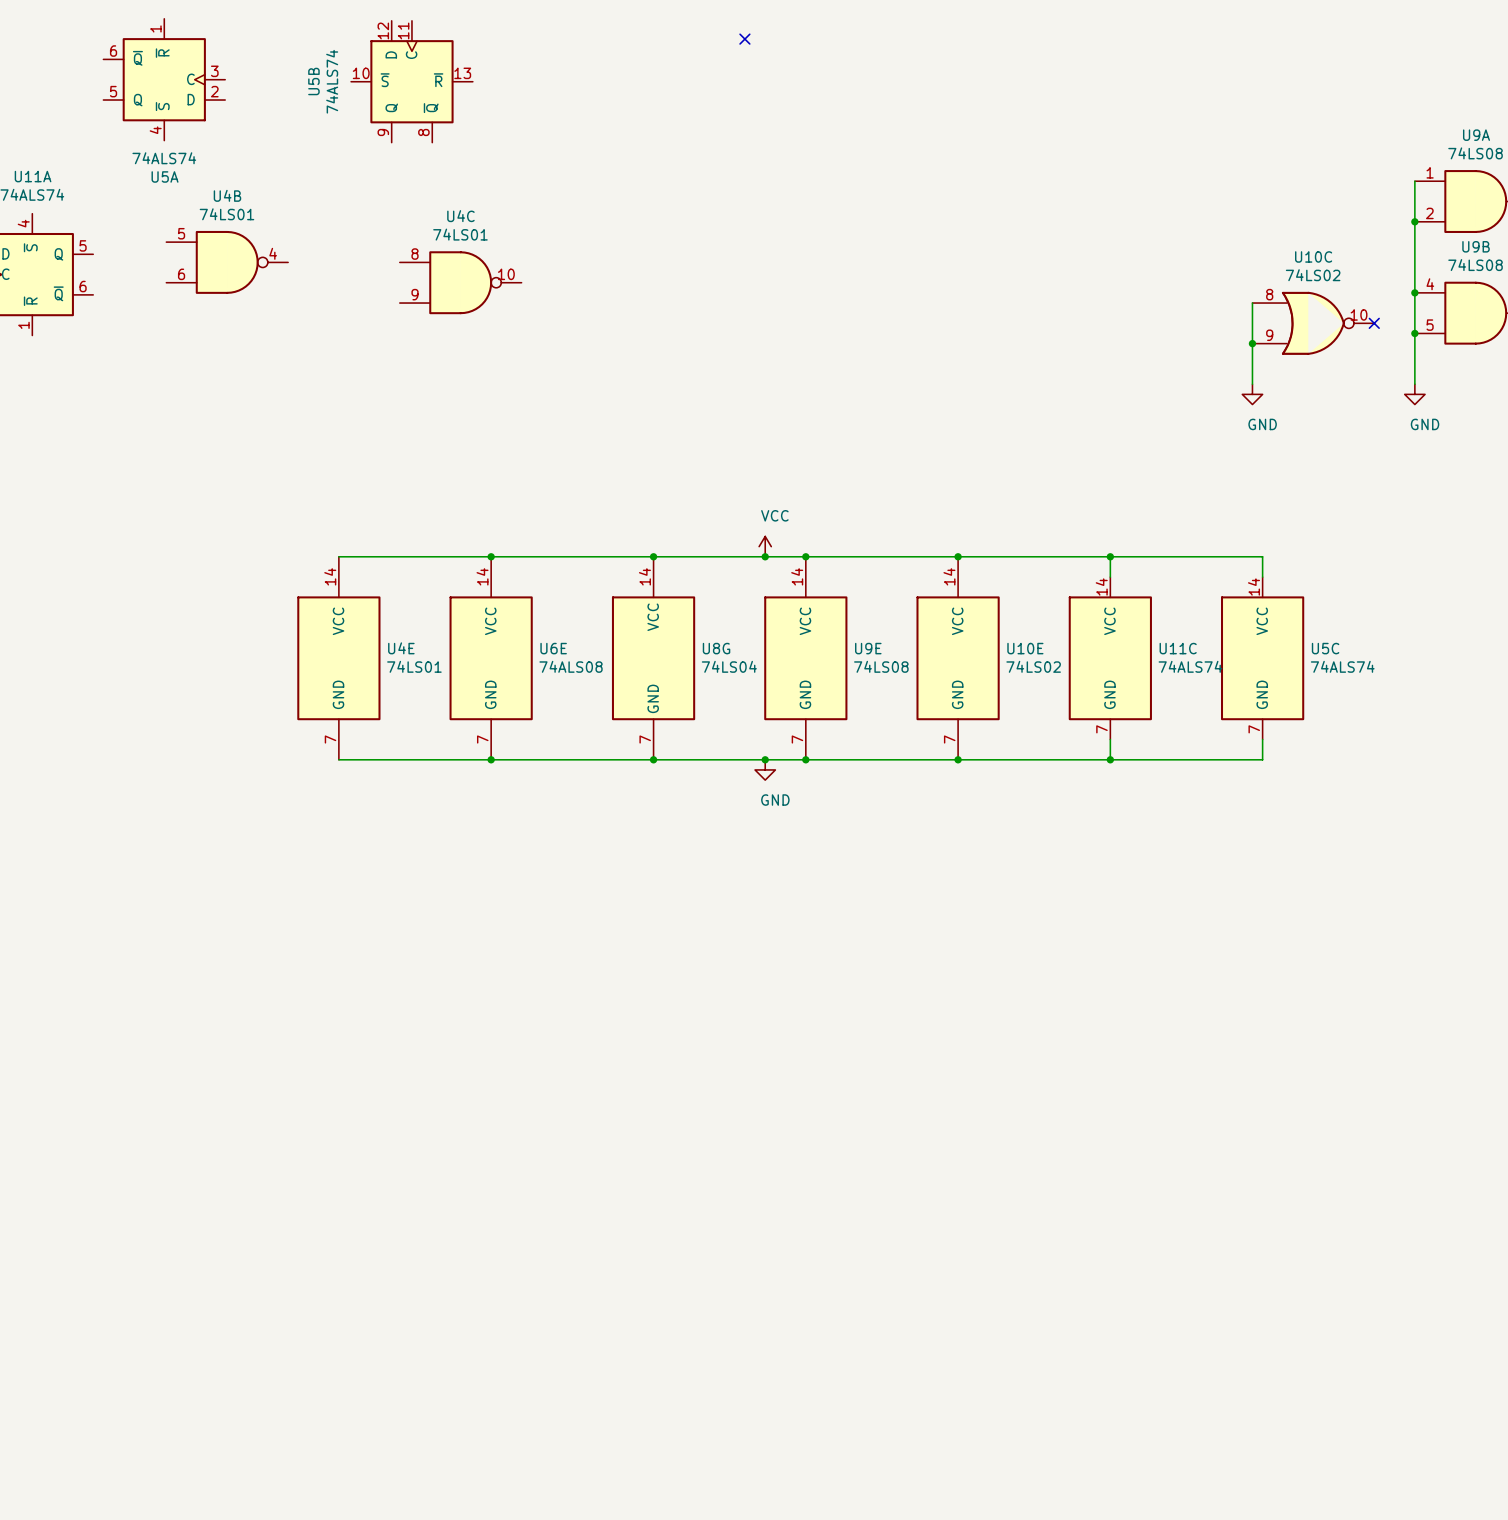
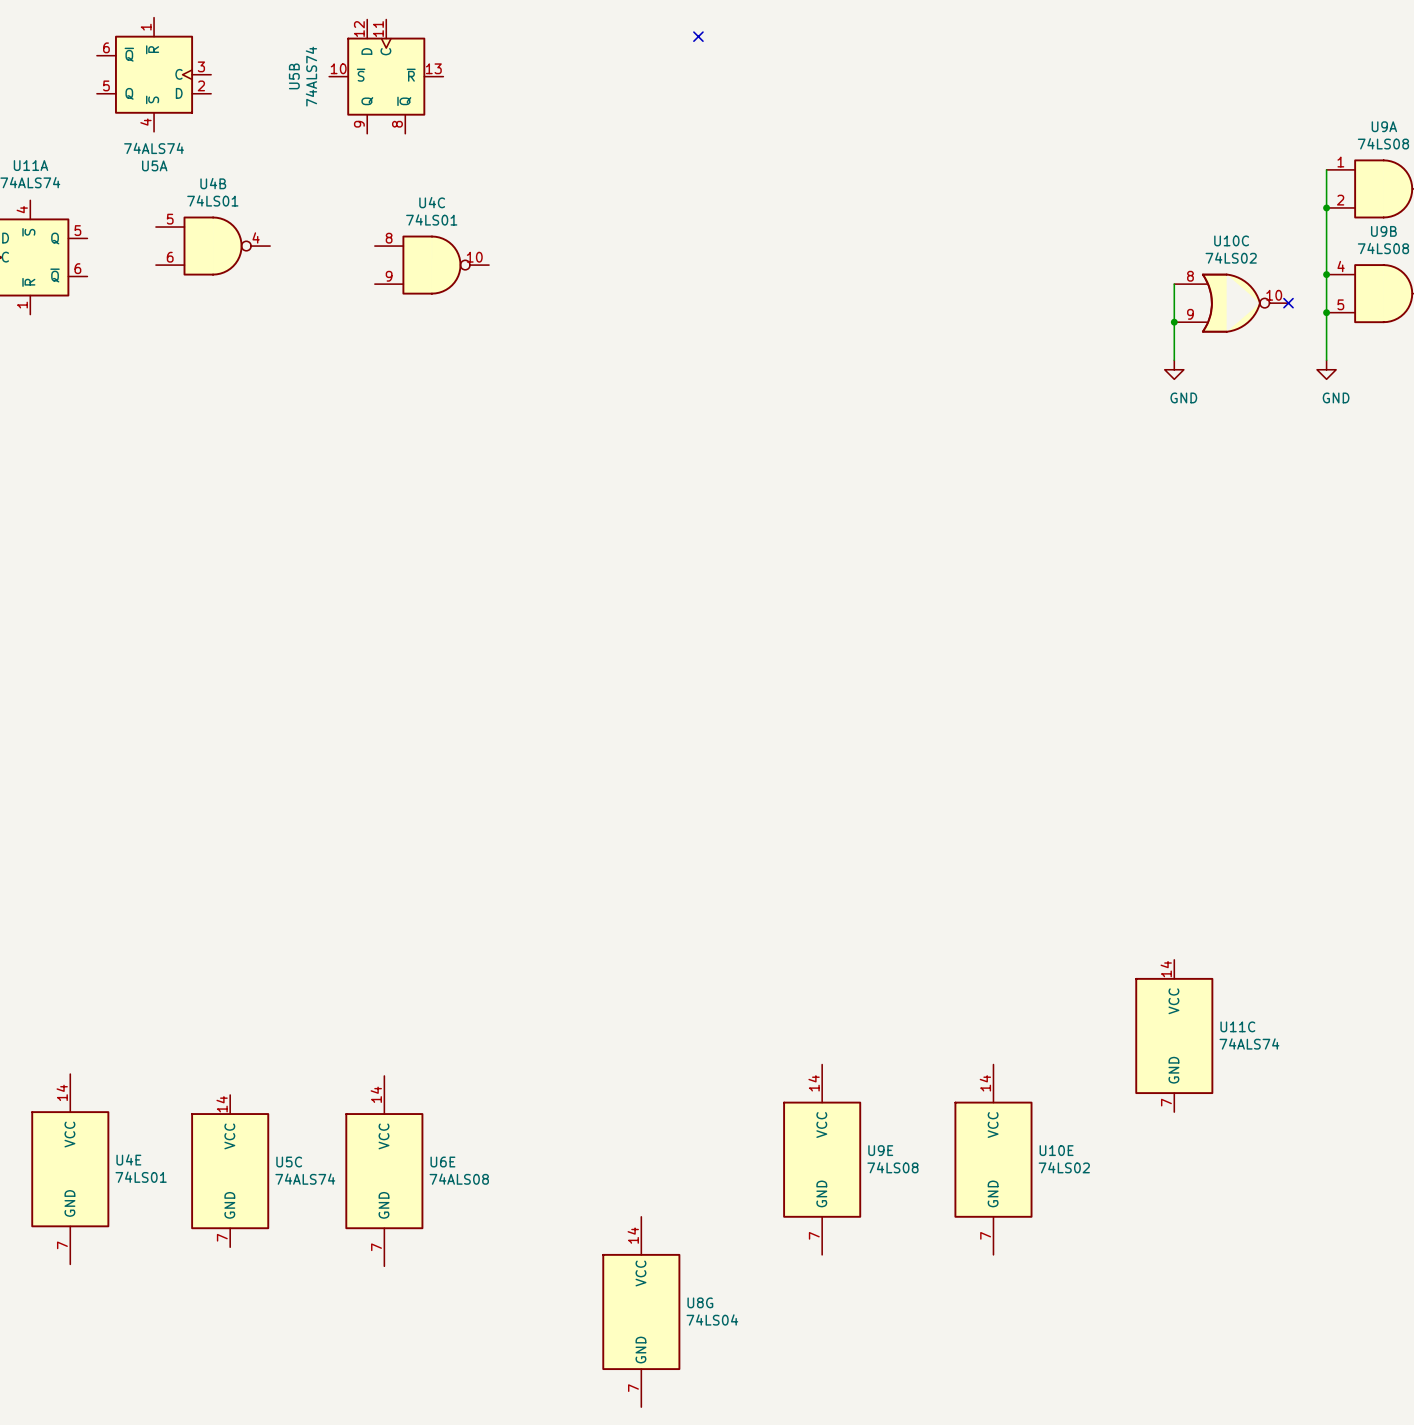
power symbol: VCC (765, 546) -> none
wire: (338, 556) (1262, 556) (1262, 577) -> none
junction: (491, 556) -> none
junction: (653, 556) -> none
junction: (765, 556) -> none
junction: (805, 556) -> none
junction: (958, 556) -> none
wire: (1110, 556) (1110, 577) -> none
junction: (1110, 556) -> none
U4E position: (338, 658) -> (70, 1169)
U6E position: (491, 658) -> (384, 1171)
U8G position: (653, 658) -> (641, 1311)
U9E position: (805, 658) -> (822, 1159)
U10E position: (958, 658) -> (993, 1159)
U11C position: (1110, 658) -> (1174, 1035)
U5C position: (1262, 658) -> (230, 1171)
wire: (1110, 739) (1110, 759) -> none
wire: (1262, 739) (1262, 759) (338, 759) -> none
junction: (491, 759) -> none
junction: (653, 759) -> none
junction: (765, 759) -> none
junction: (805, 759) -> none
junction: (958, 759) -> none
junction: (1110, 759) -> none
power symbol: GND (765, 769) -> none

